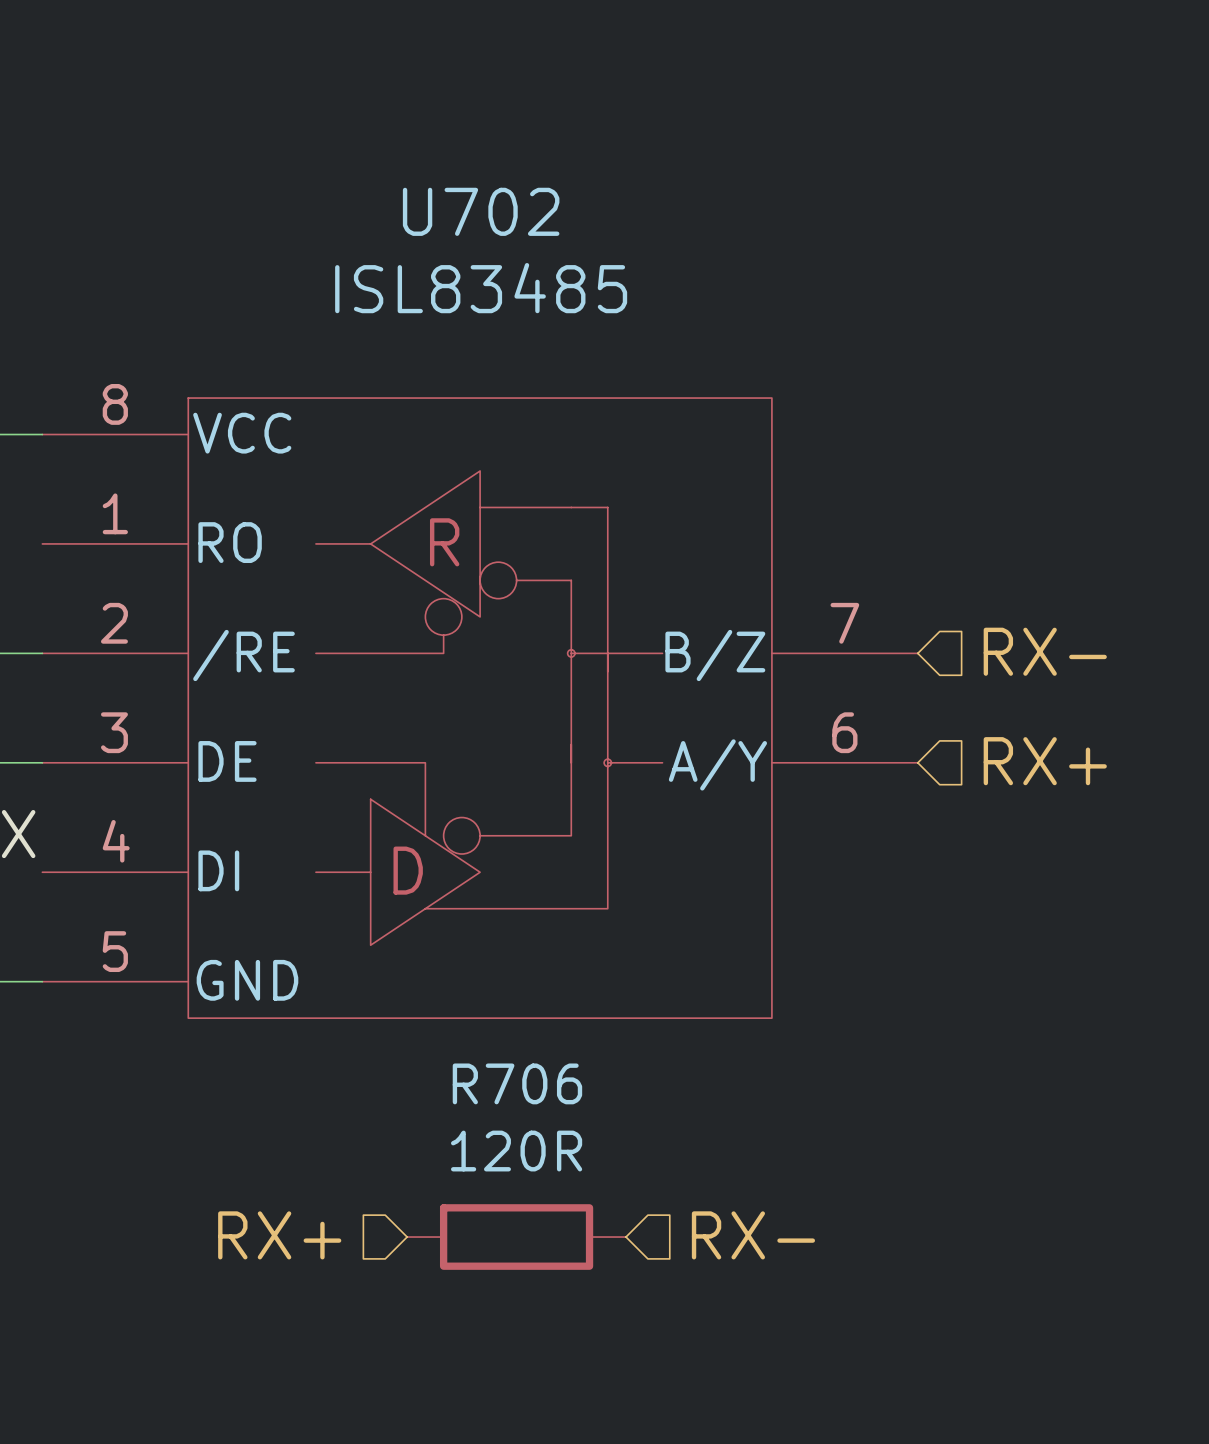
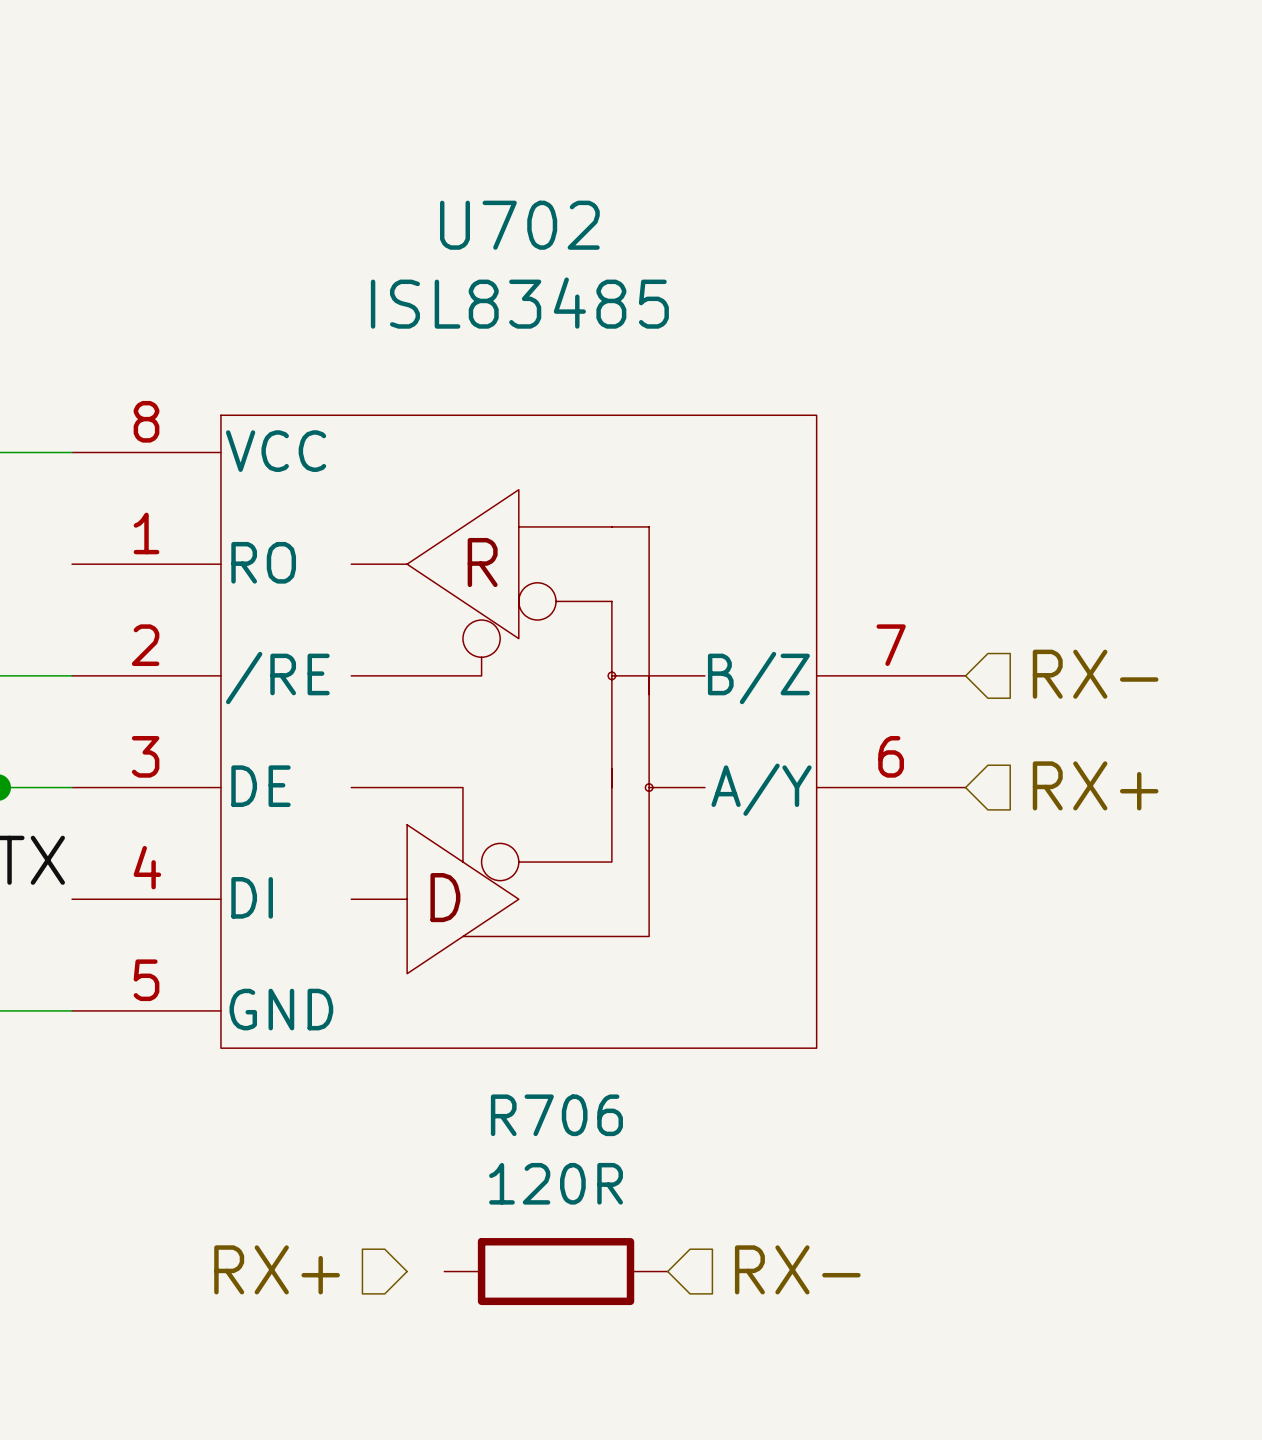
hierarchical label position: RX+ (279, 1235) -> RX+ (277, 1269)

